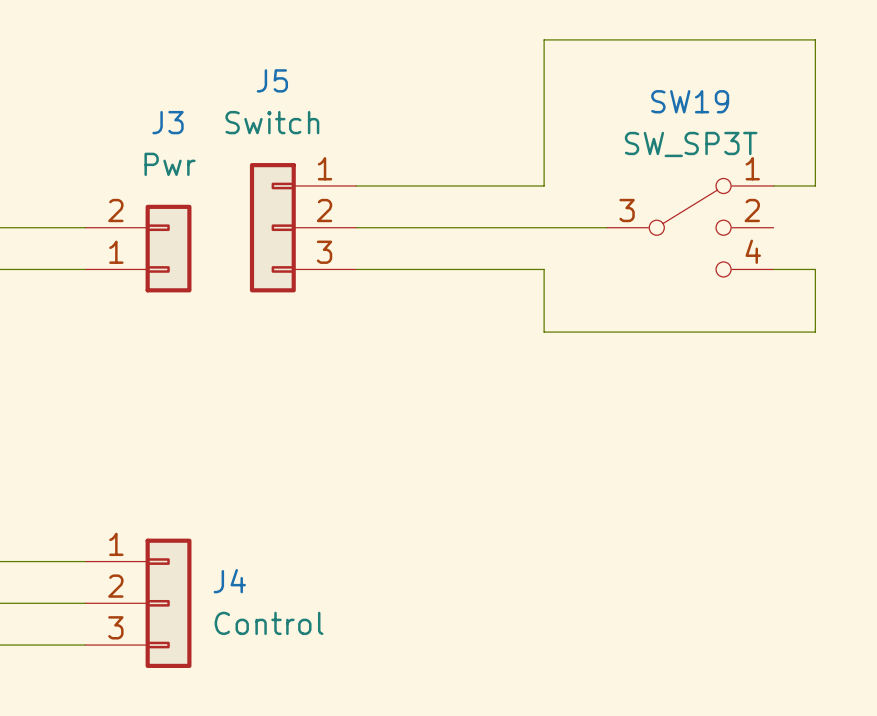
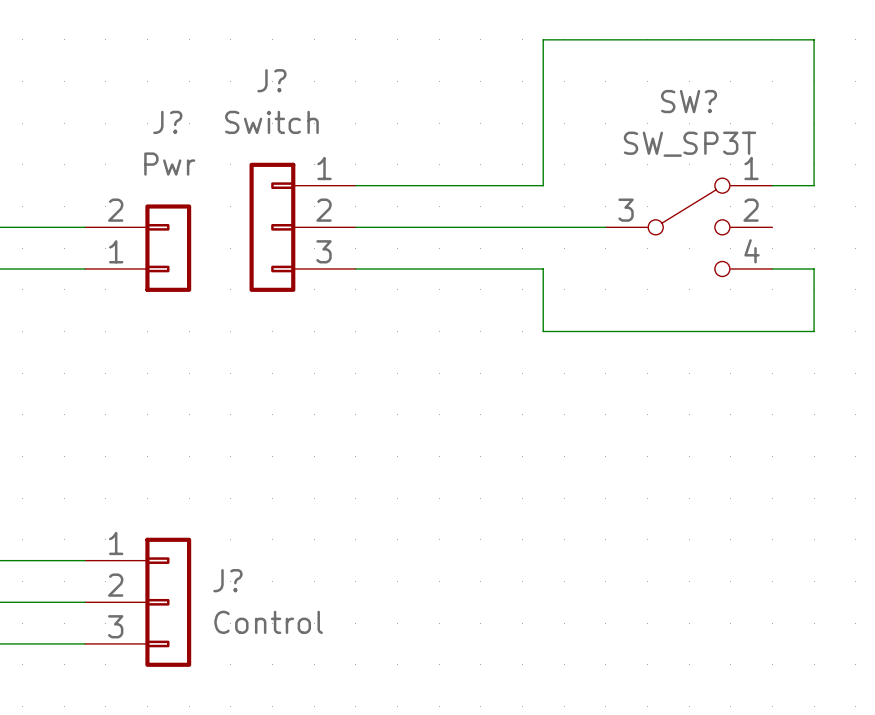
J5 name: J5 (272, 80) -> J? (271, 80)
SW19 name: SW19 (690, 101) -> SW? (689, 101)
J3 name: J3 (168, 122) -> J? (167, 122)
J4 name: J4 (229, 581) -> J? (227, 580)

